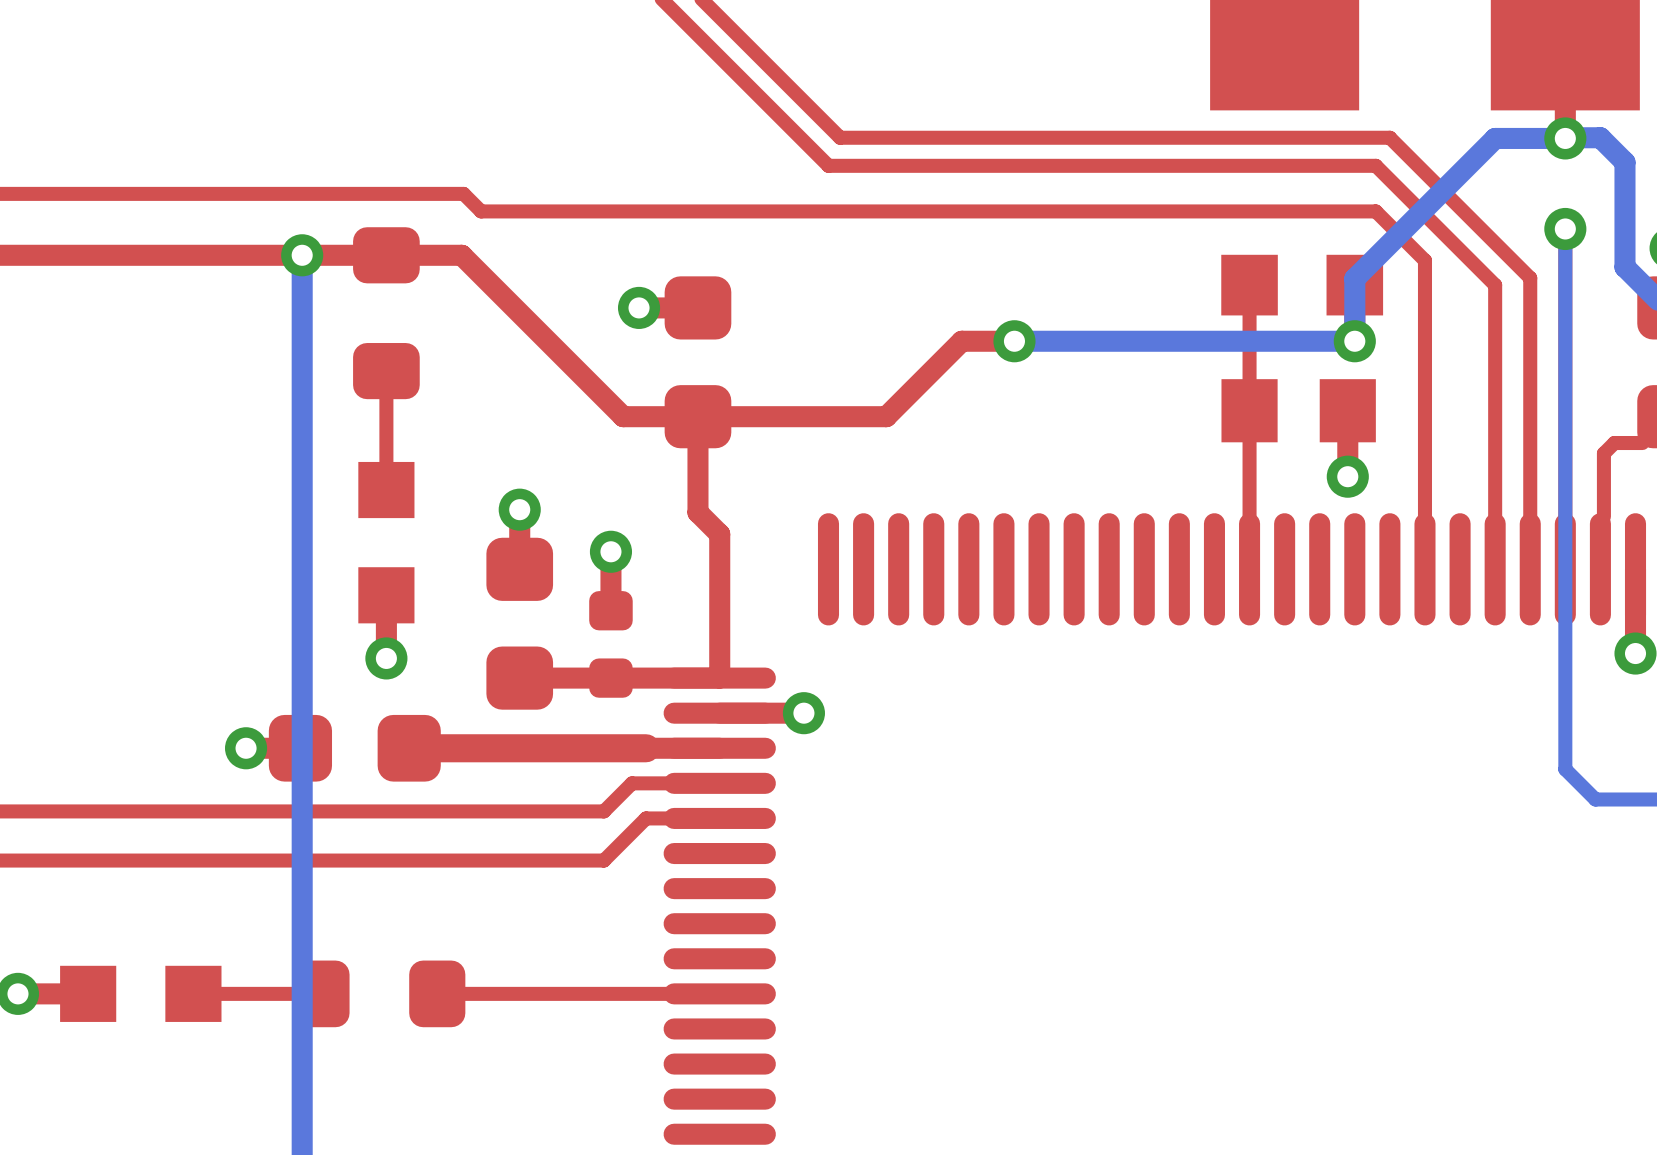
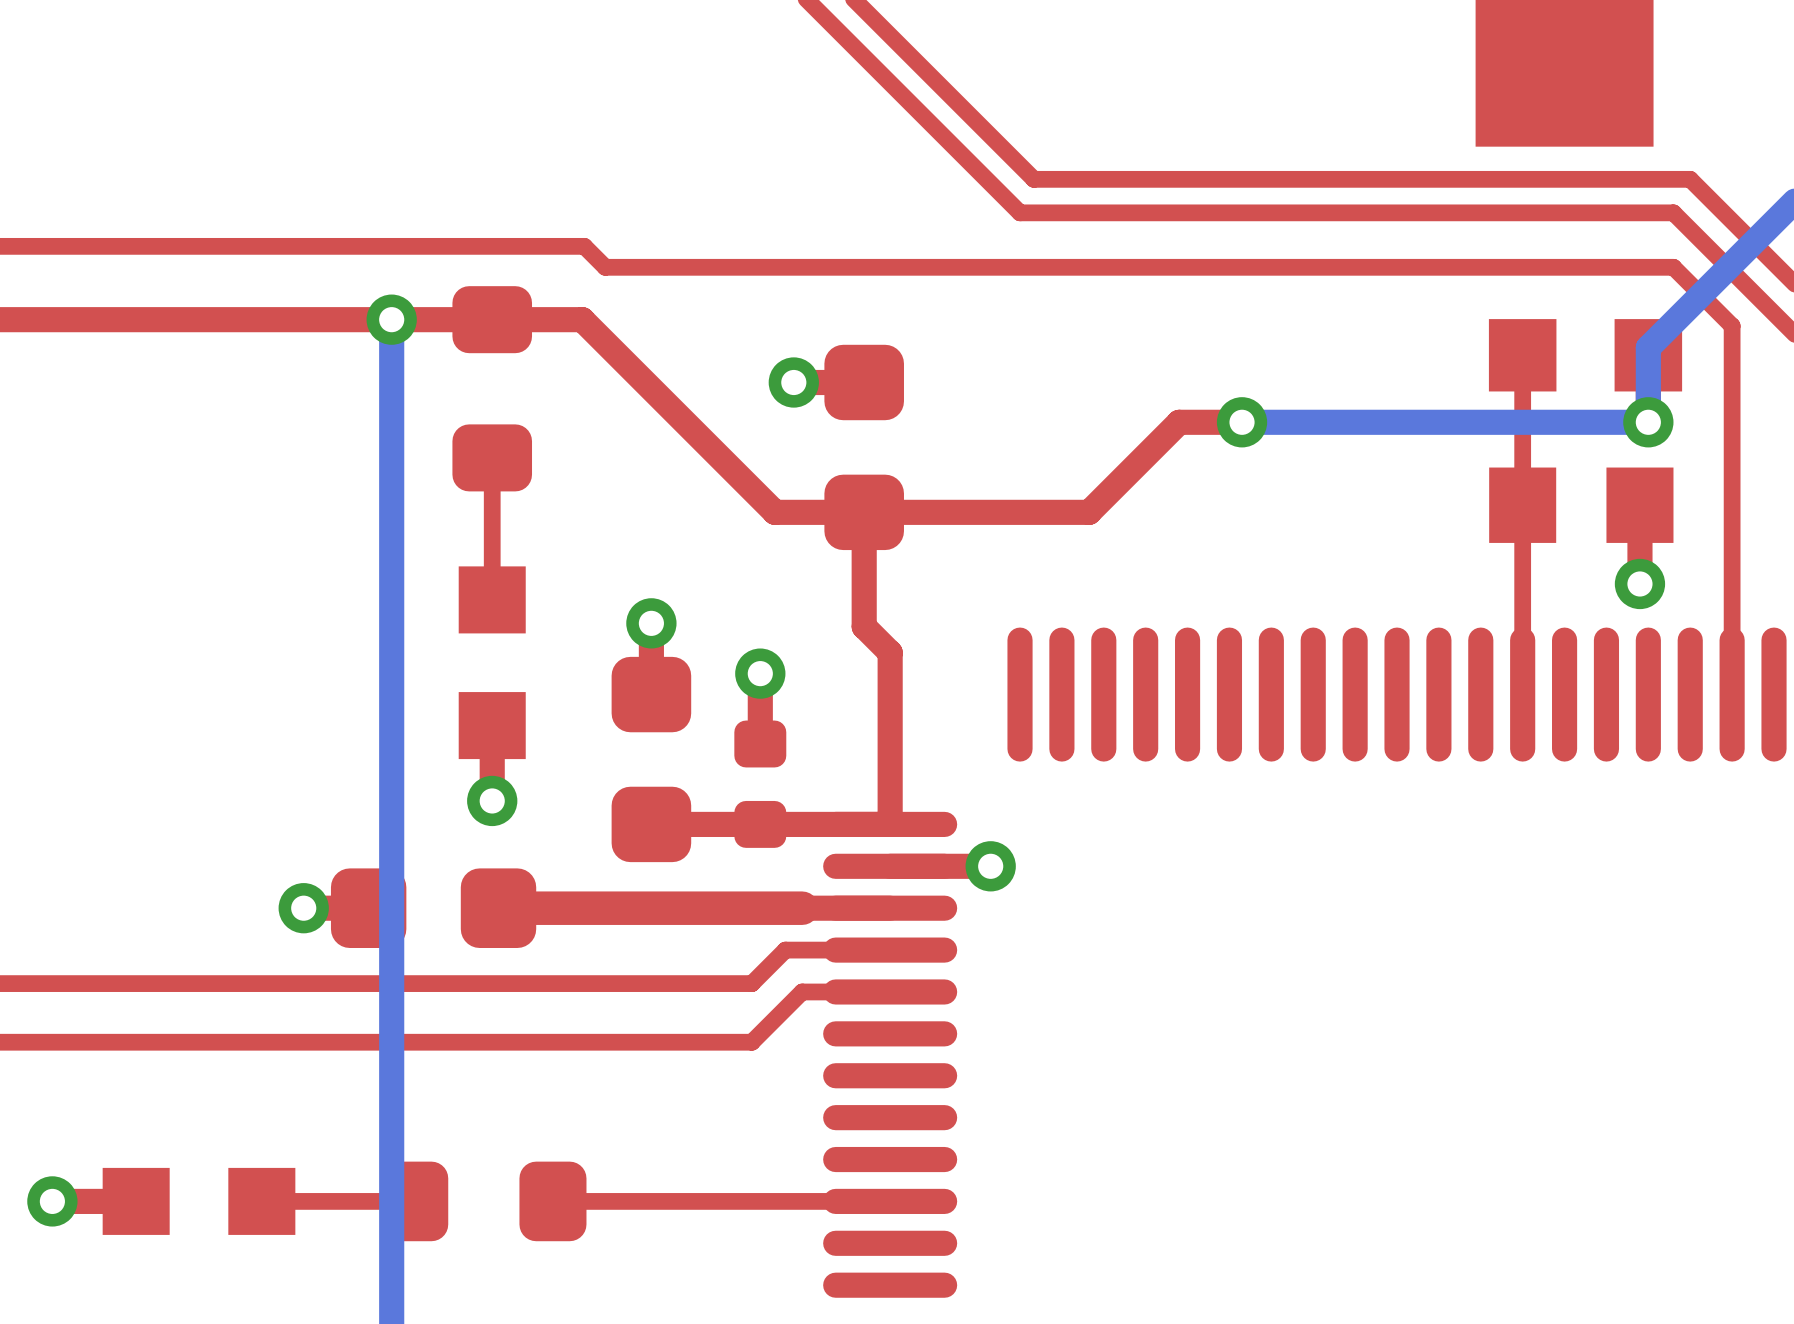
via position: (246, 748) -> (303, 908)
part position: (354, 748) -> (433, 908)

